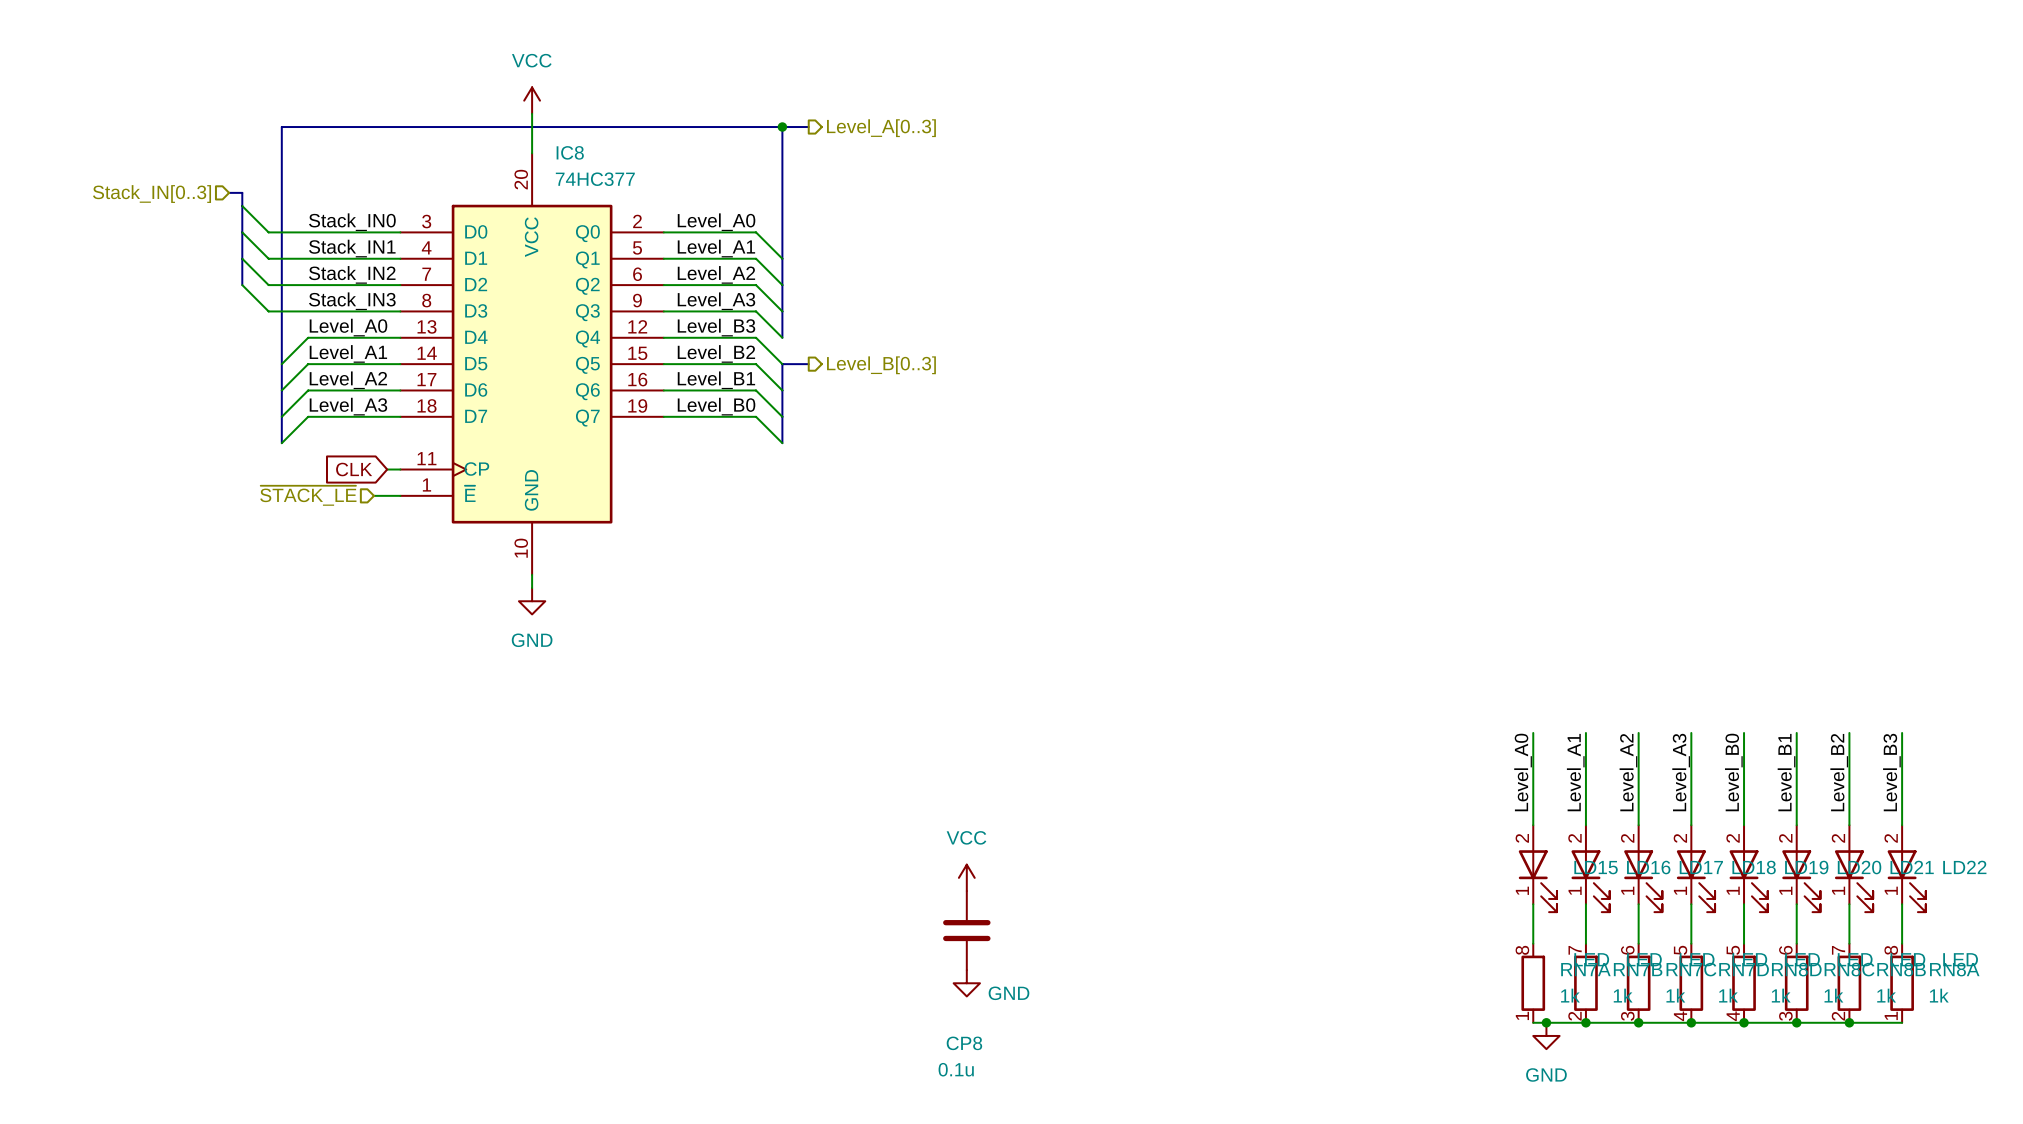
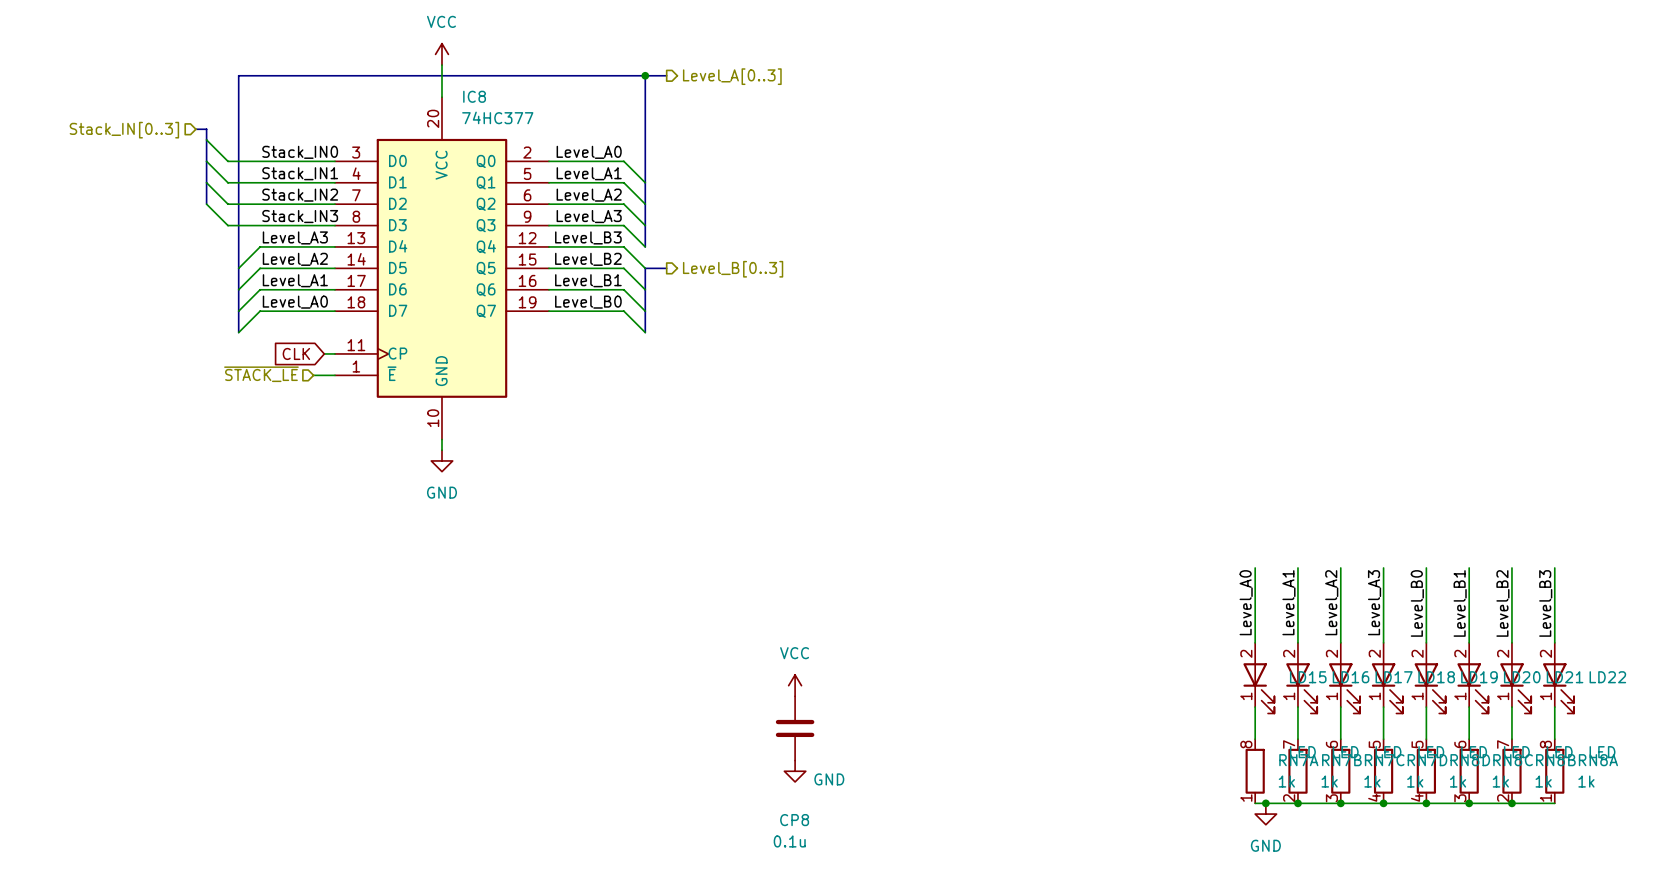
label: Level_A0 (348, 327) -> Level_A3 (295, 237)
label: Level_A1 (348, 353) -> Level_A2 (295, 259)
label: Level_A2 (348, 380) -> Level_A1 (295, 280)
label: Level_A3 (348, 406) -> Level_A0 (295, 302)

